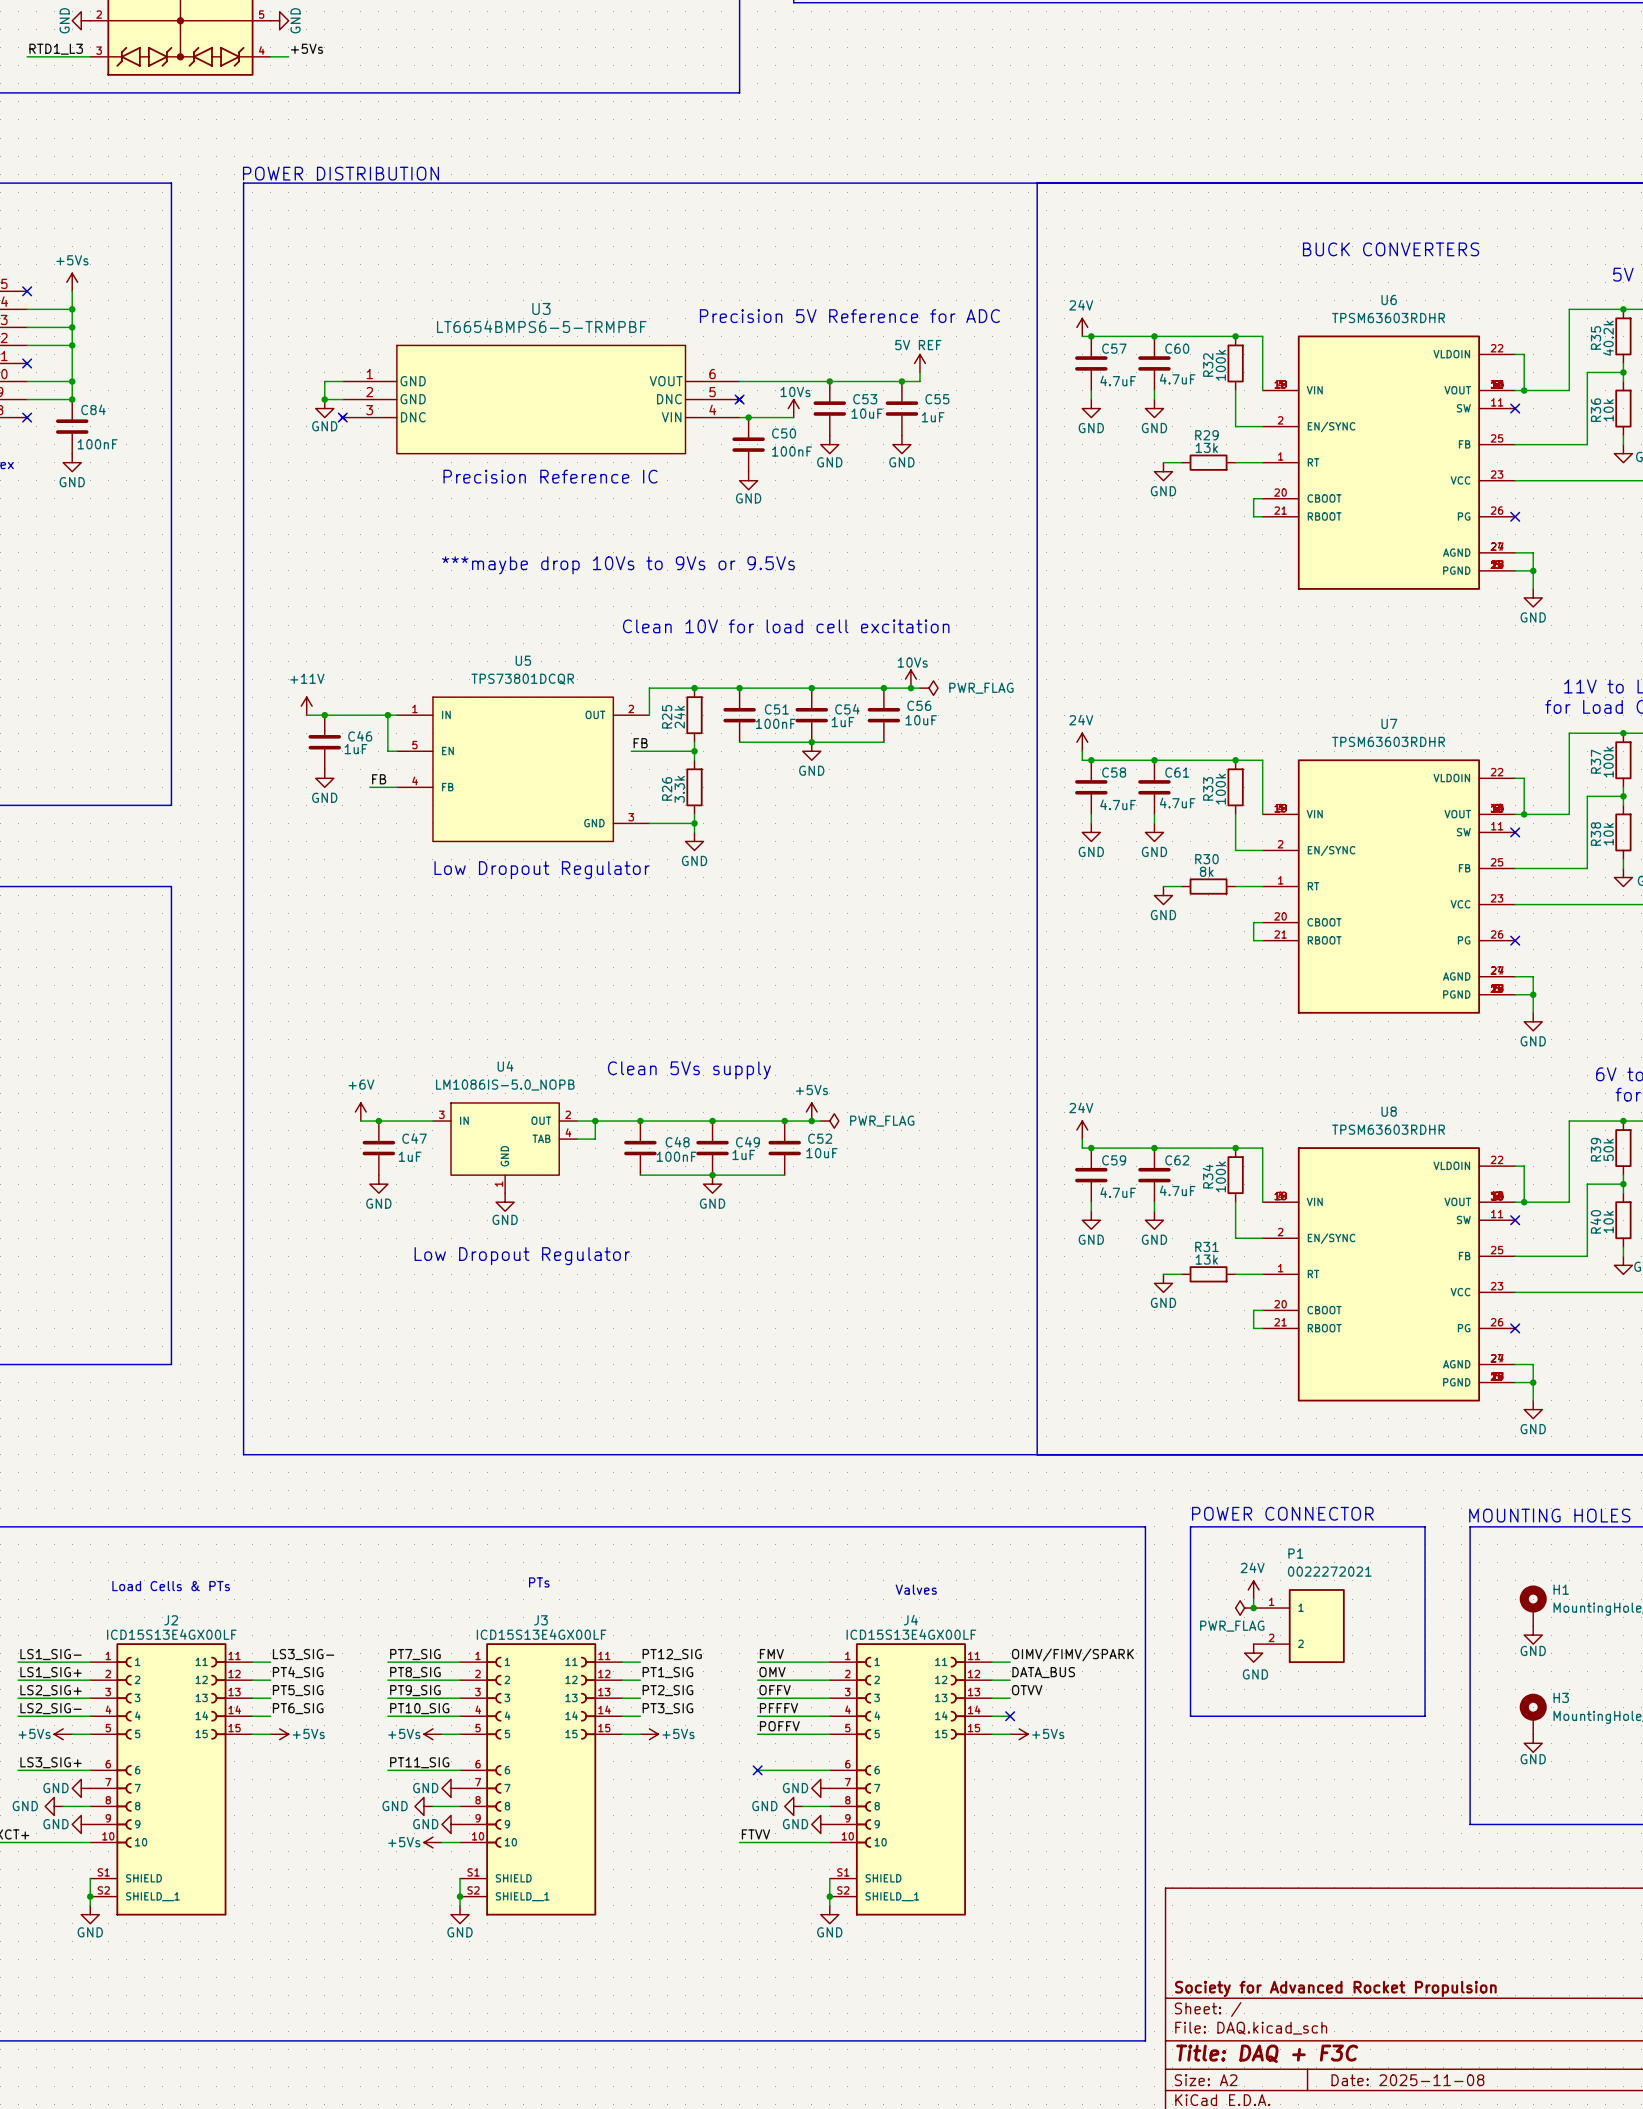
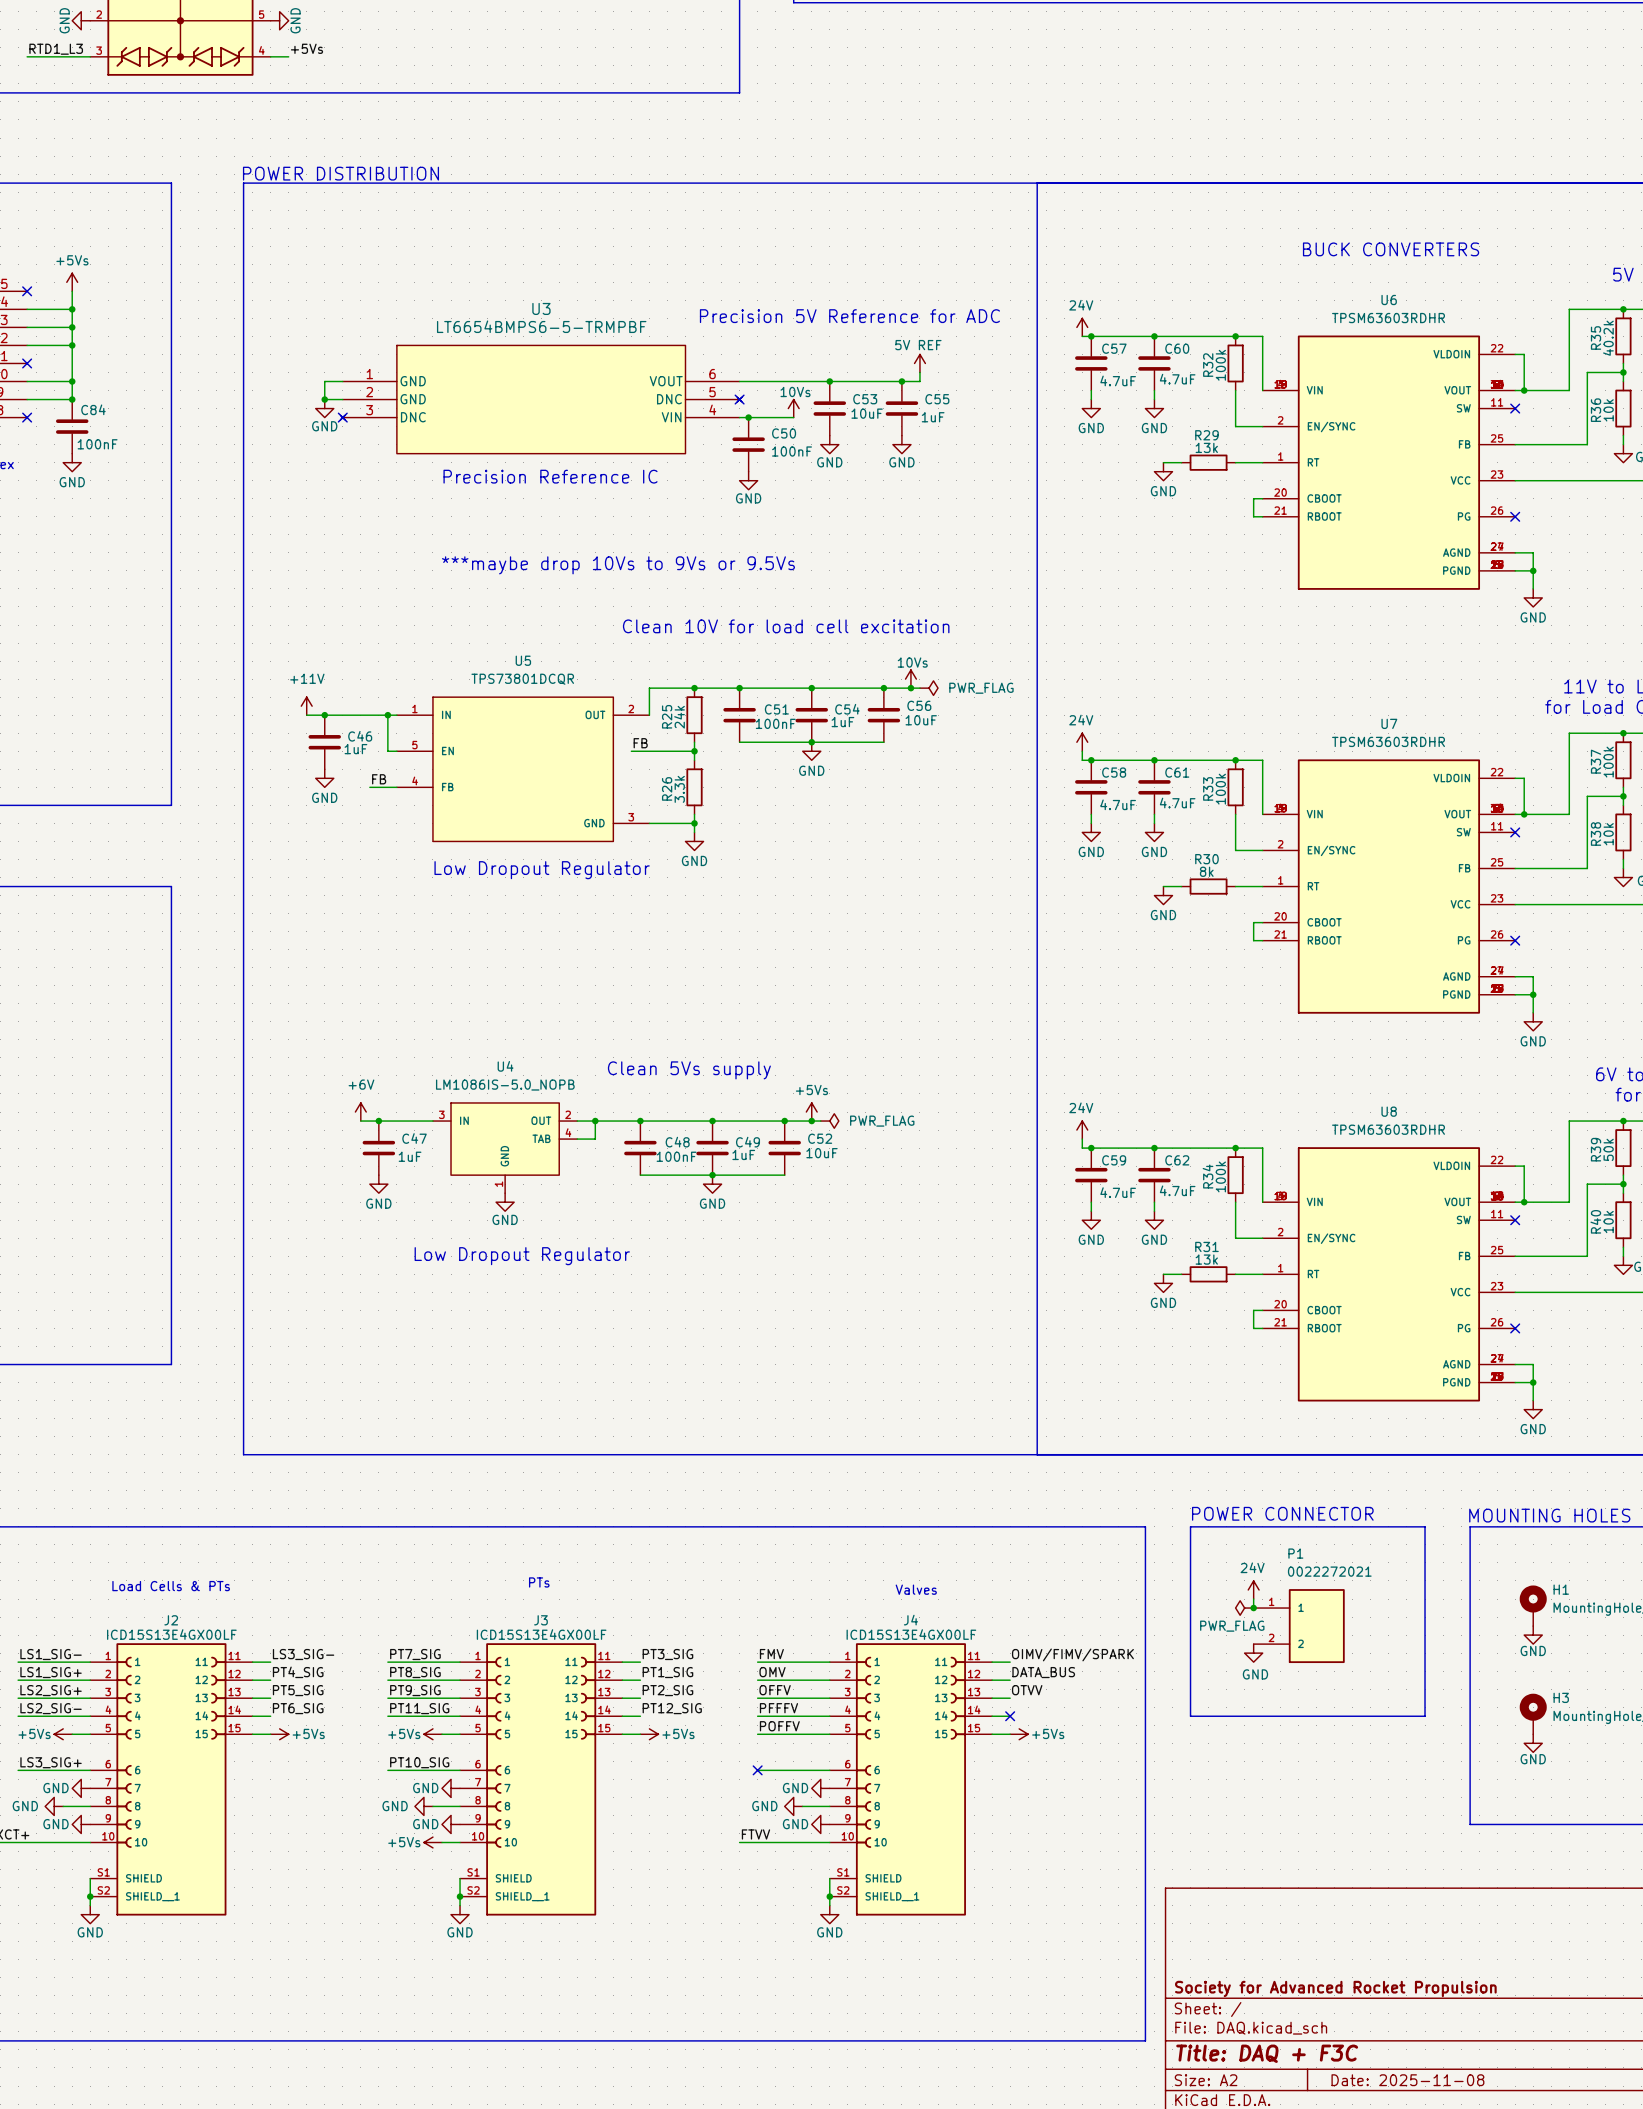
label: PT12_SIG (672, 1654) -> PT3_SIG (667, 1654)
label: PT10_SIG (419, 1708) -> PT11_SIG (419, 1708)
label: PT3_SIG (667, 1708) -> PT12_SIG (672, 1708)
label: PT11_SIG (419, 1762) -> PT10_SIG (419, 1762)

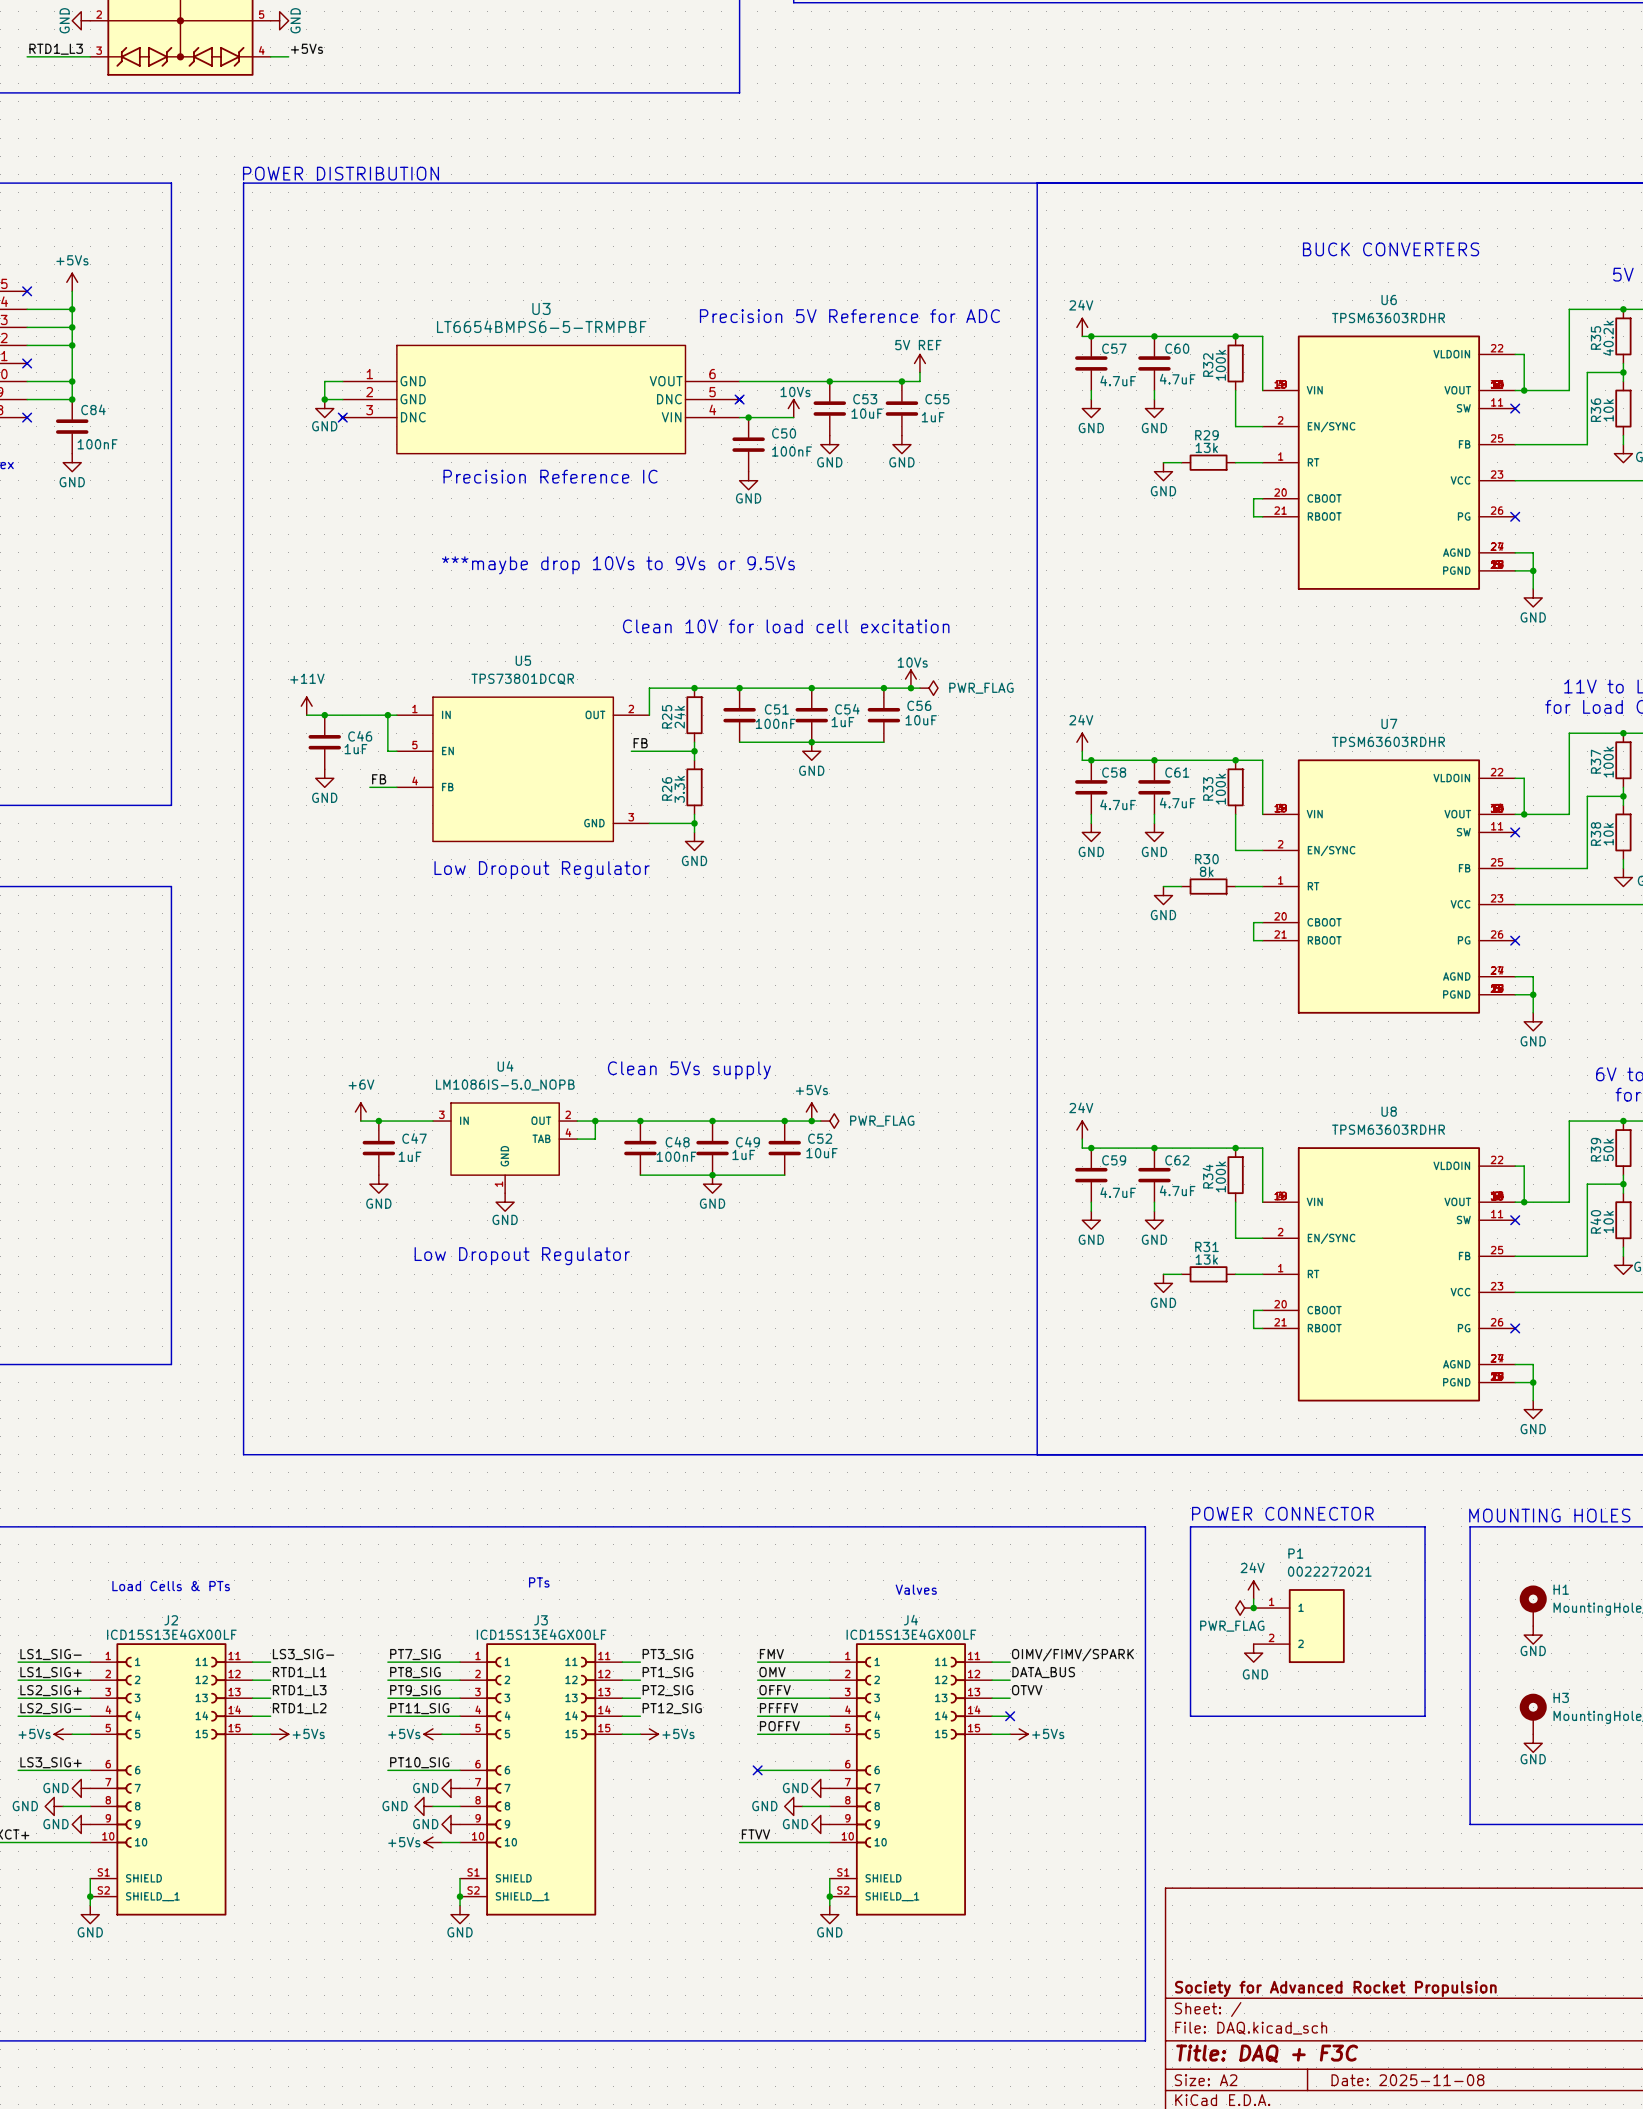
label: PT4_SIG (298, 1672) -> RTD1_L1 (299, 1672)
label: PT5_SIG (298, 1690) -> RTD1_L3 (299, 1690)
label: PT6_SIG (298, 1708) -> RTD1_L2 (299, 1708)

